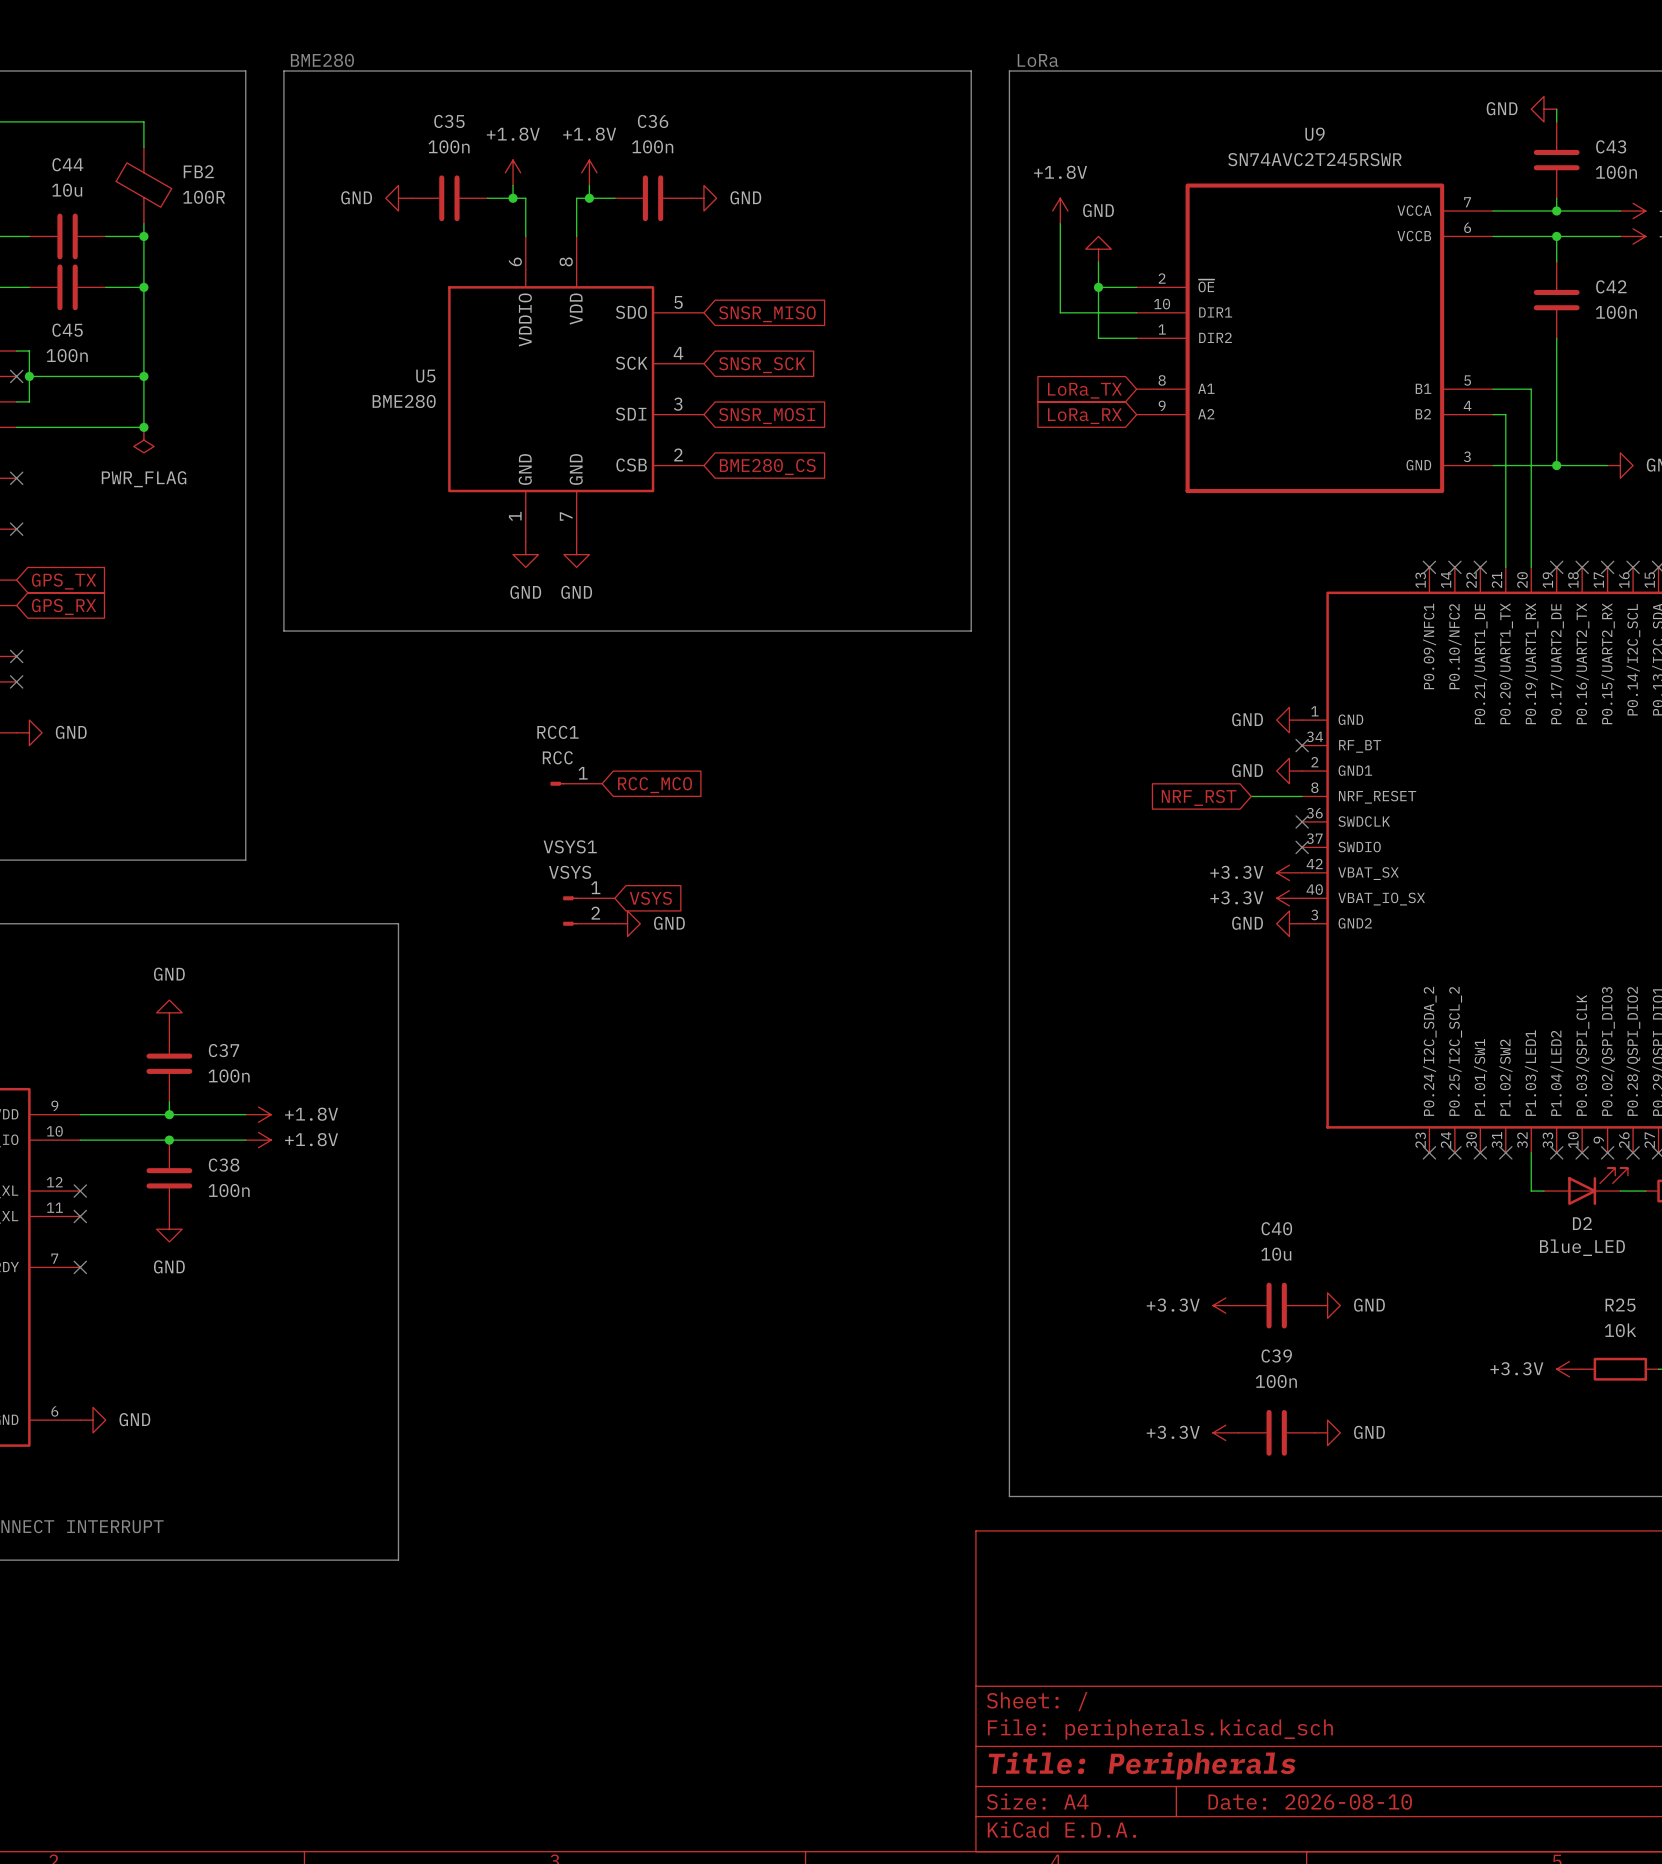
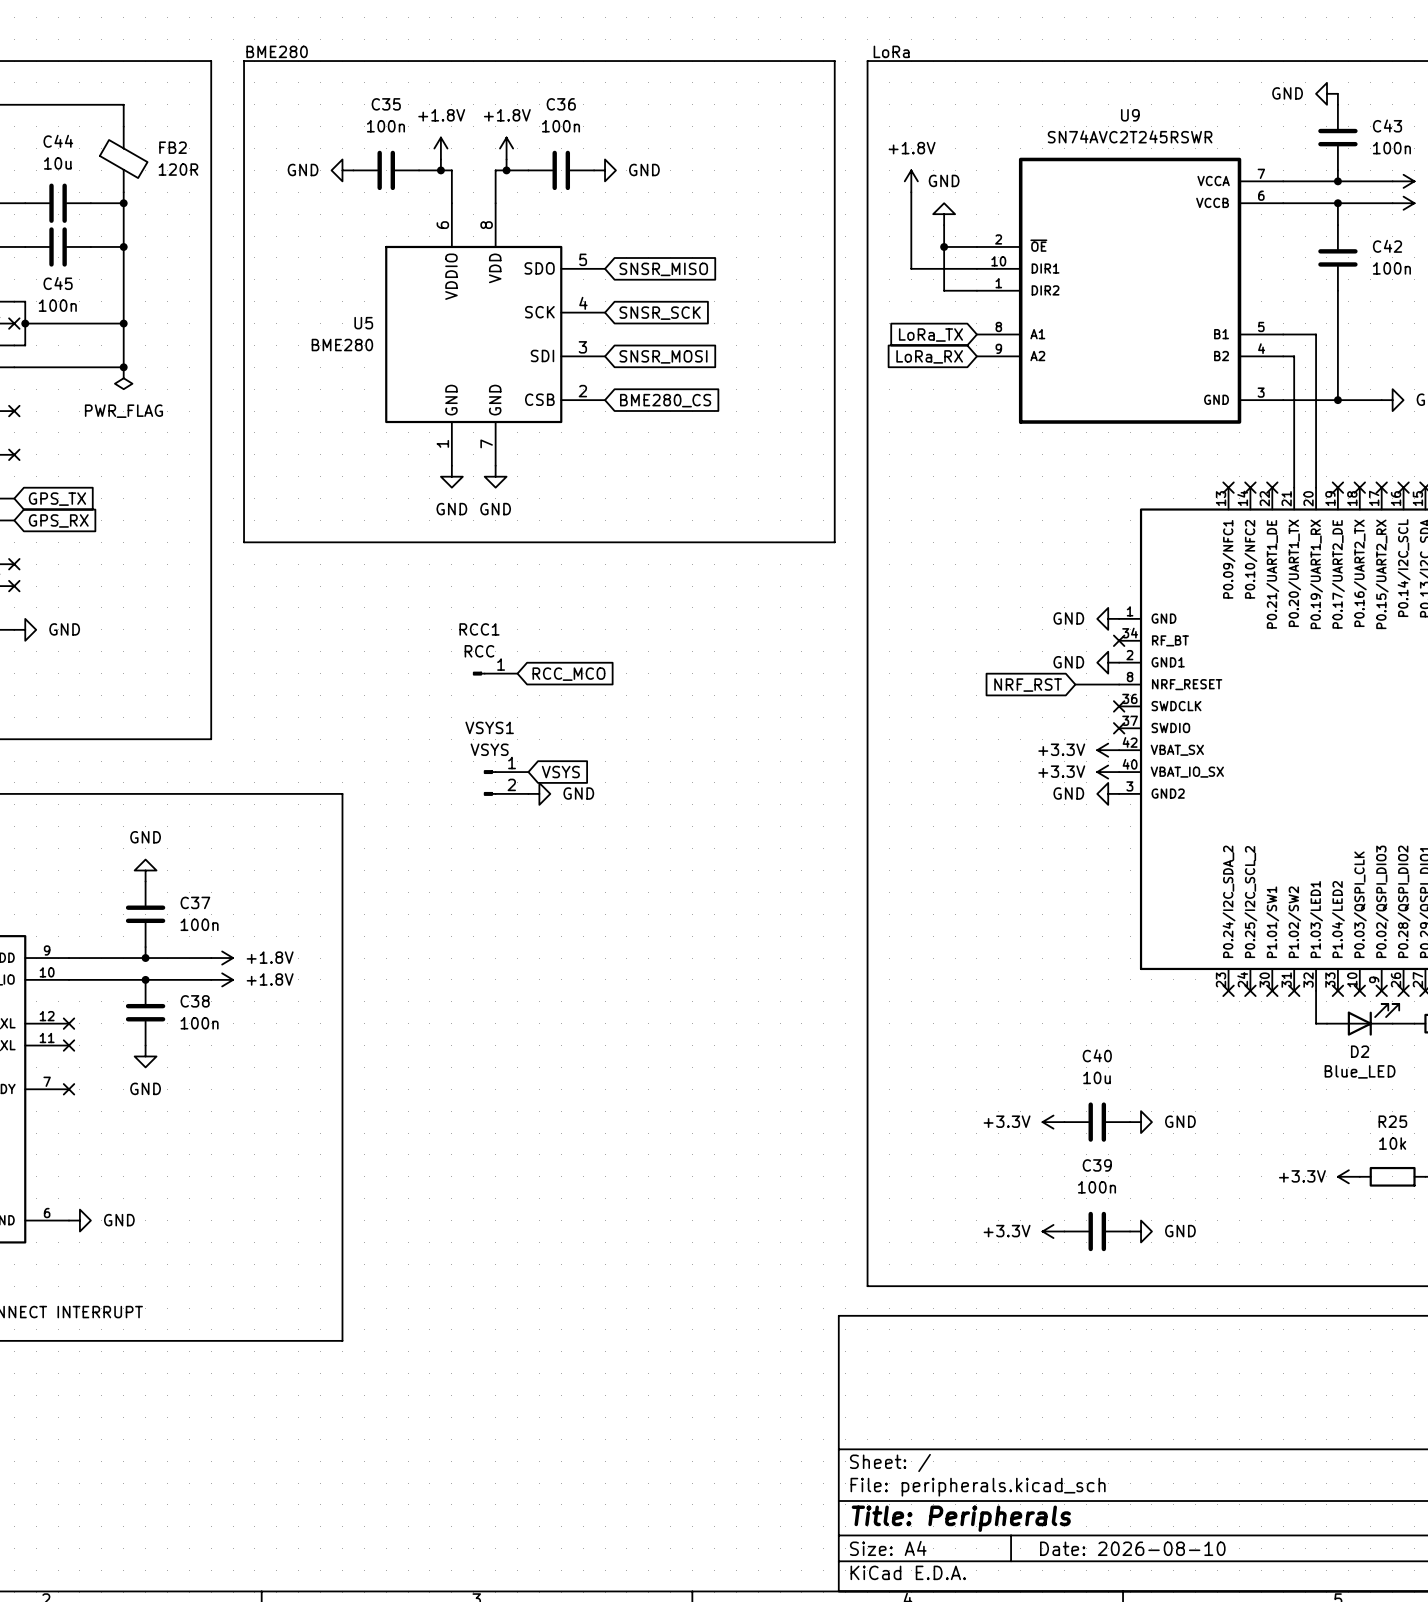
FB2 value: 100R (204, 197) -> 120R (178, 169)

